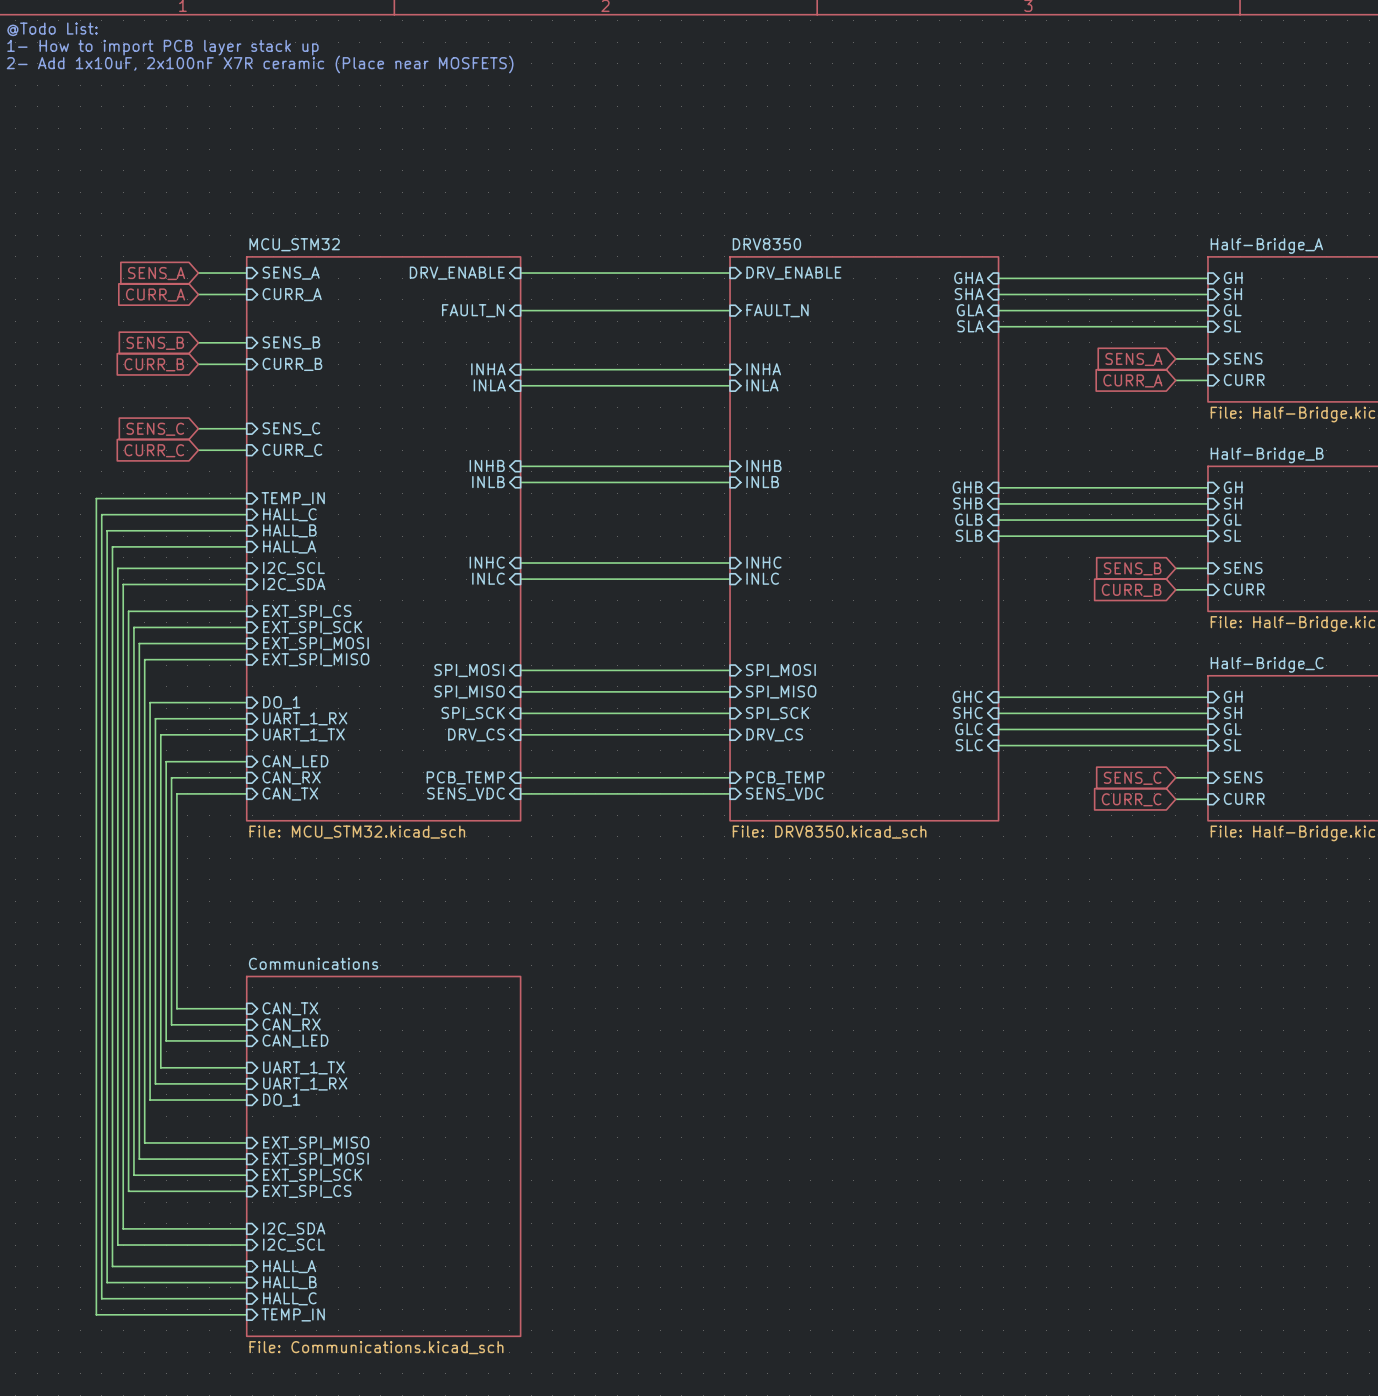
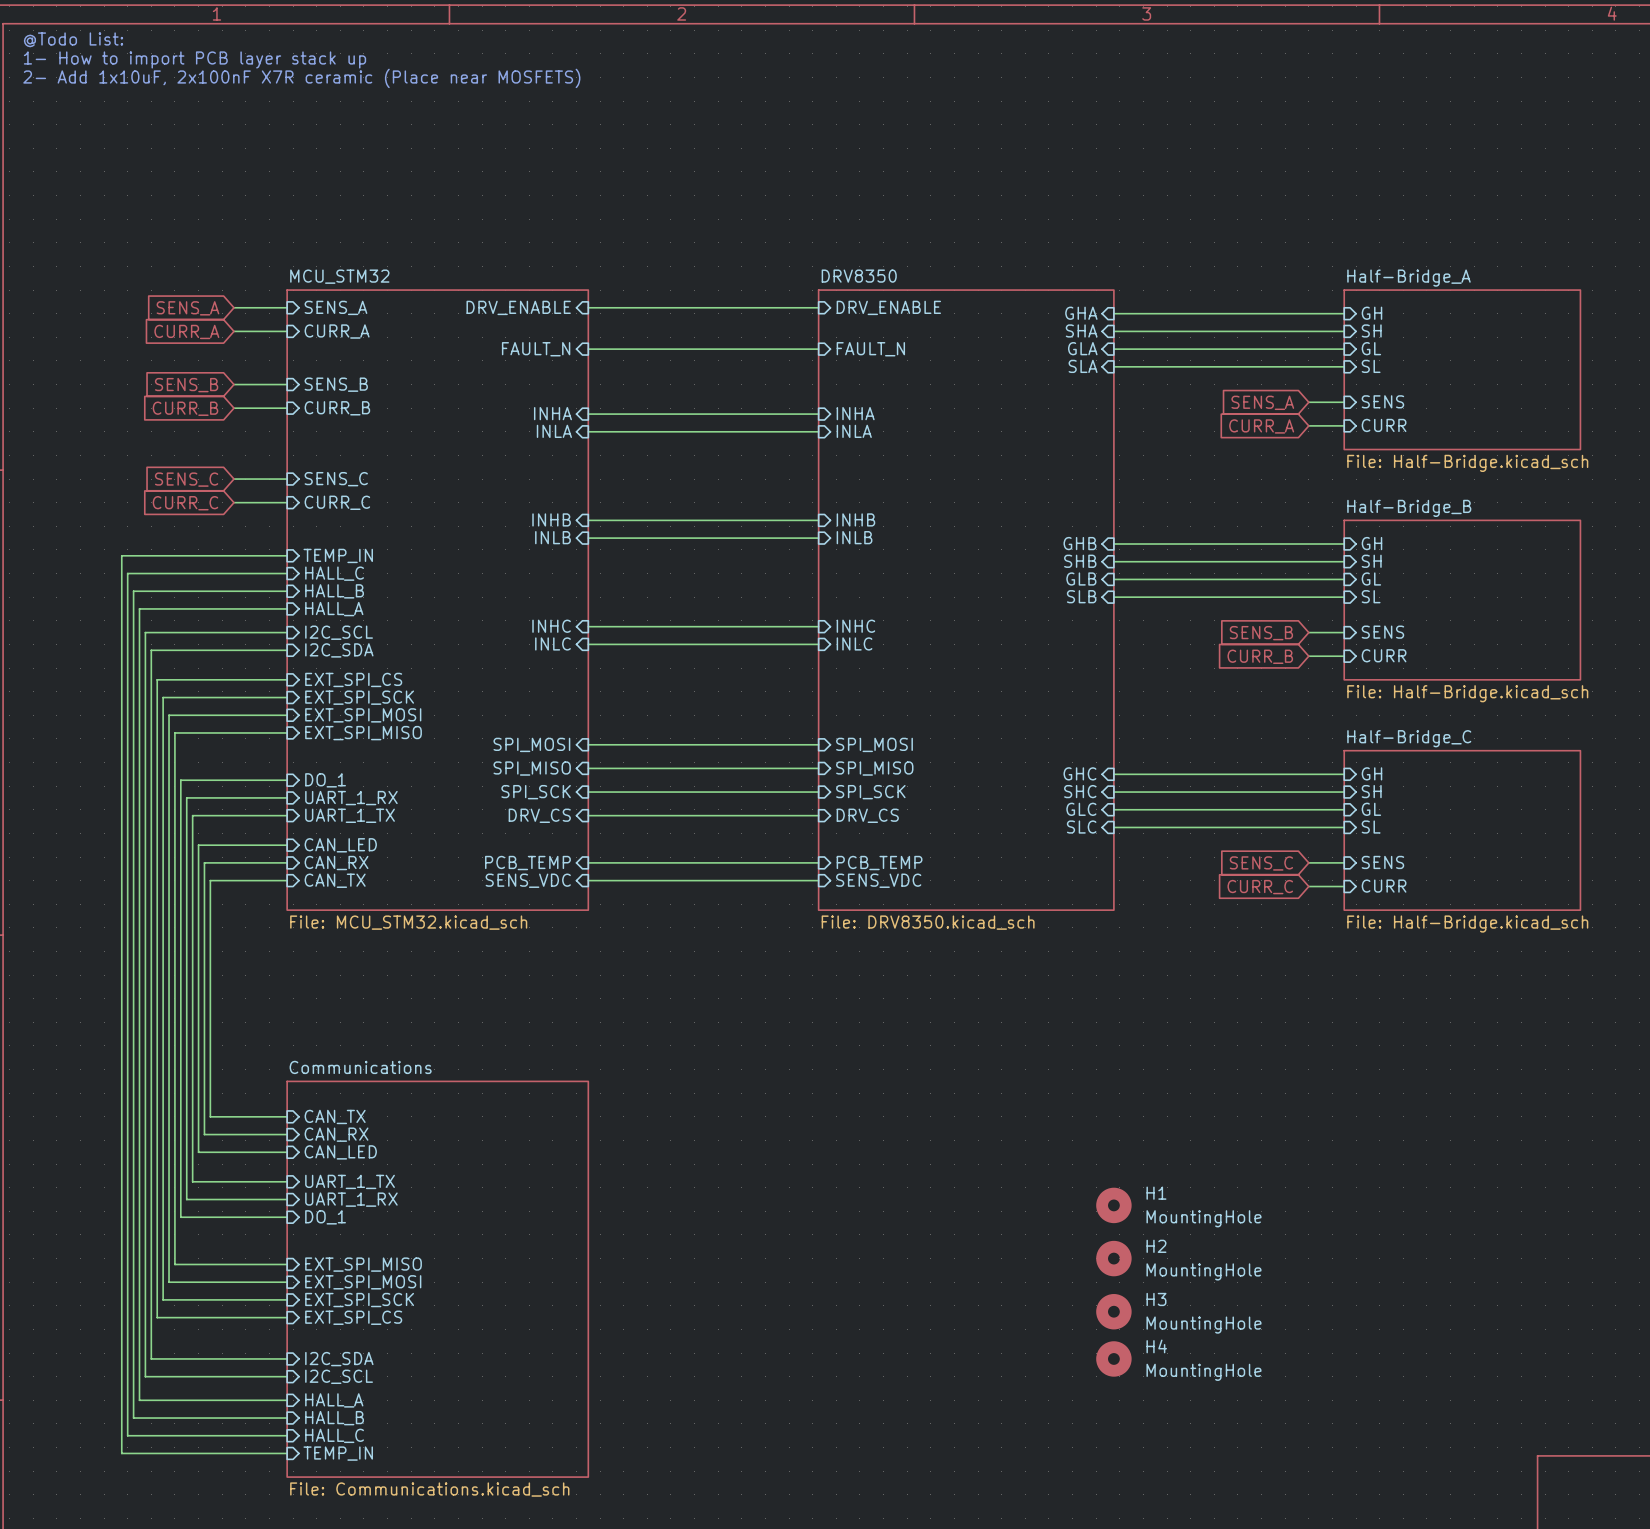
H1: none -> MountingHole (1113, 1205)
H2: none -> MountingHole (1113, 1258)
H3: none -> MountingHole (1113, 1311)
H4: none -> MountingHole (1113, 1358)

